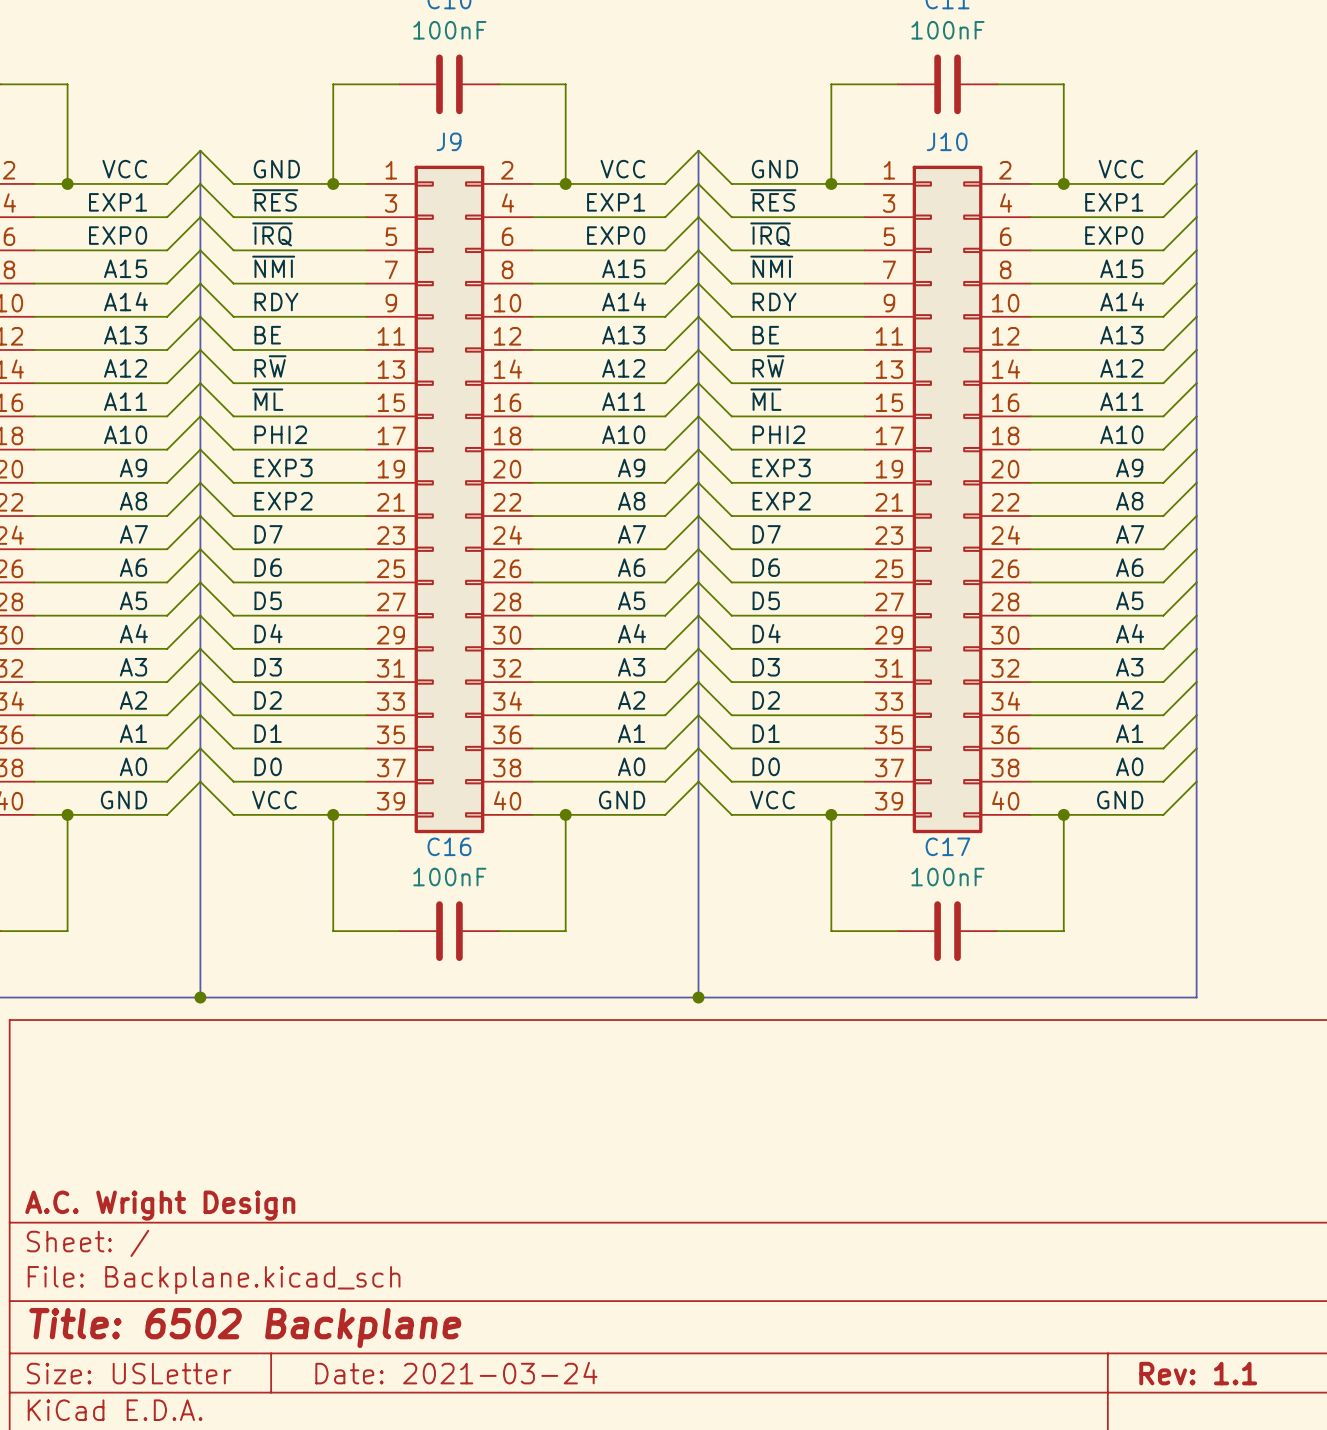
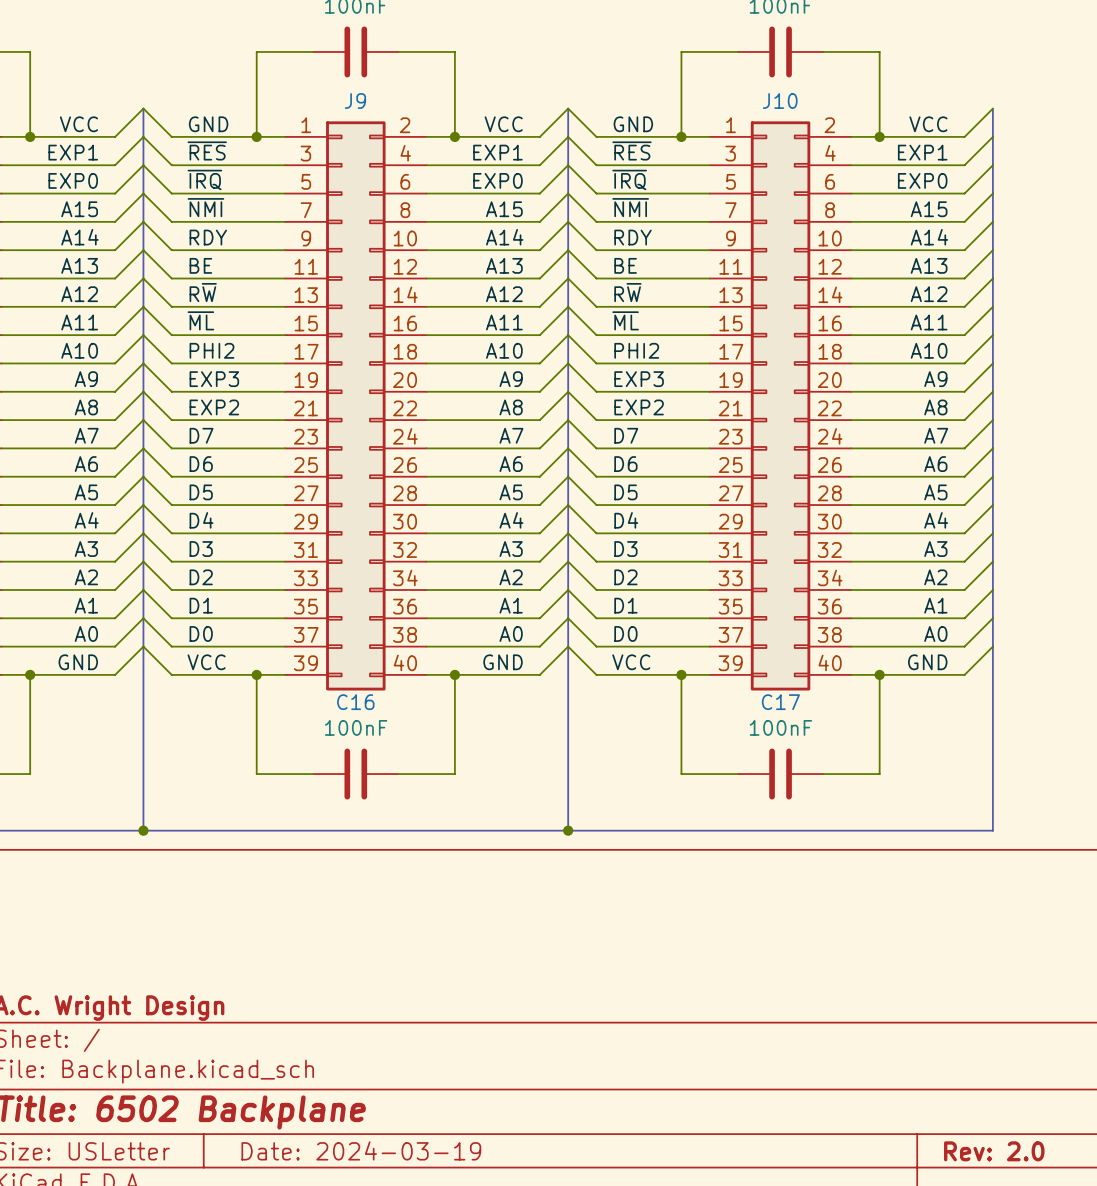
title block: Date: 2021-03-24 (456, 1373) -> Date: 2024-03-19 (361, 1150)
title block: Rev: 1.1 (1198, 1373) -> Rev: 2.0 (994, 1151)

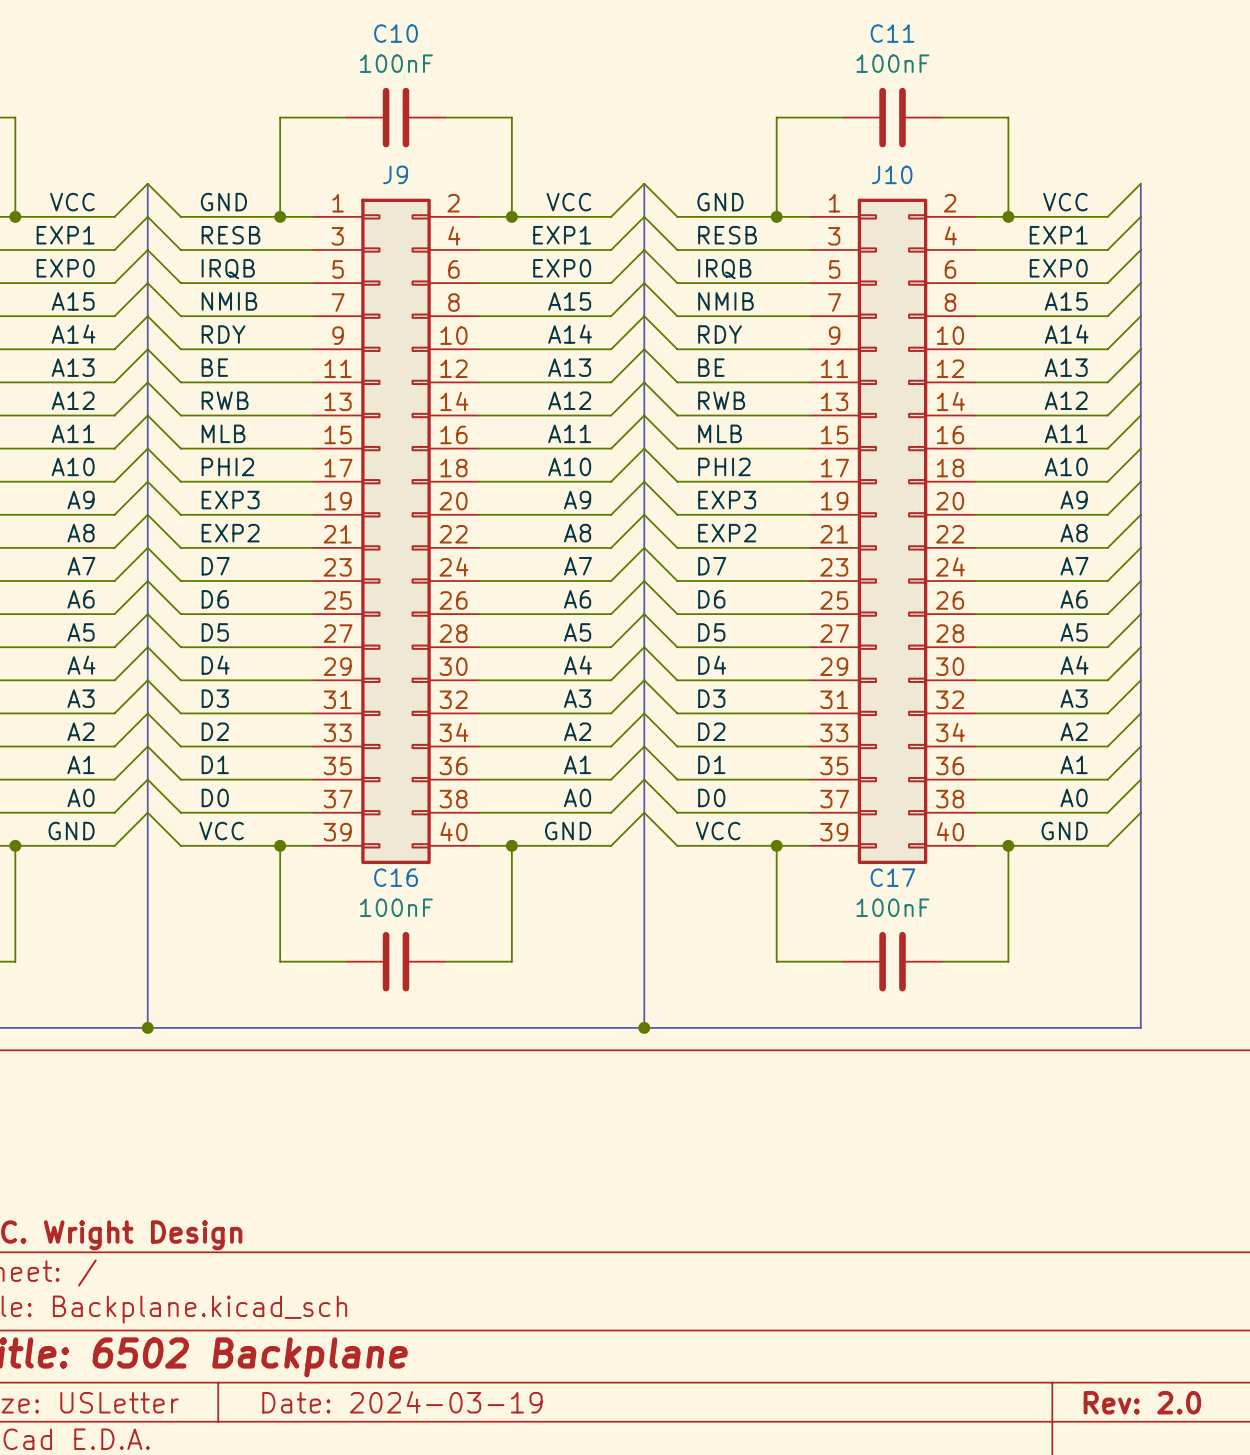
label: ~{RES} (207, 150) -> RESB (231, 235)
label: ~{RES} (632, 150) -> RESB (727, 235)
label: ~{IRQ} (204, 179) -> IRQB (228, 269)
label: ~{IRQ} (629, 179) -> IRQB (724, 269)
label: ~{NMI} (205, 207) -> NMIB (229, 301)
label: ~{NMI} (630, 207) -> NMIB (725, 301)
label: R~{W} (203, 292) -> RWB (225, 400)
label: R~{W} (627, 292) -> RWB (721, 400)
label: ~{ML} (200, 320) -> MLB (223, 433)
label: ~{ML} (625, 320) -> MLB (720, 433)

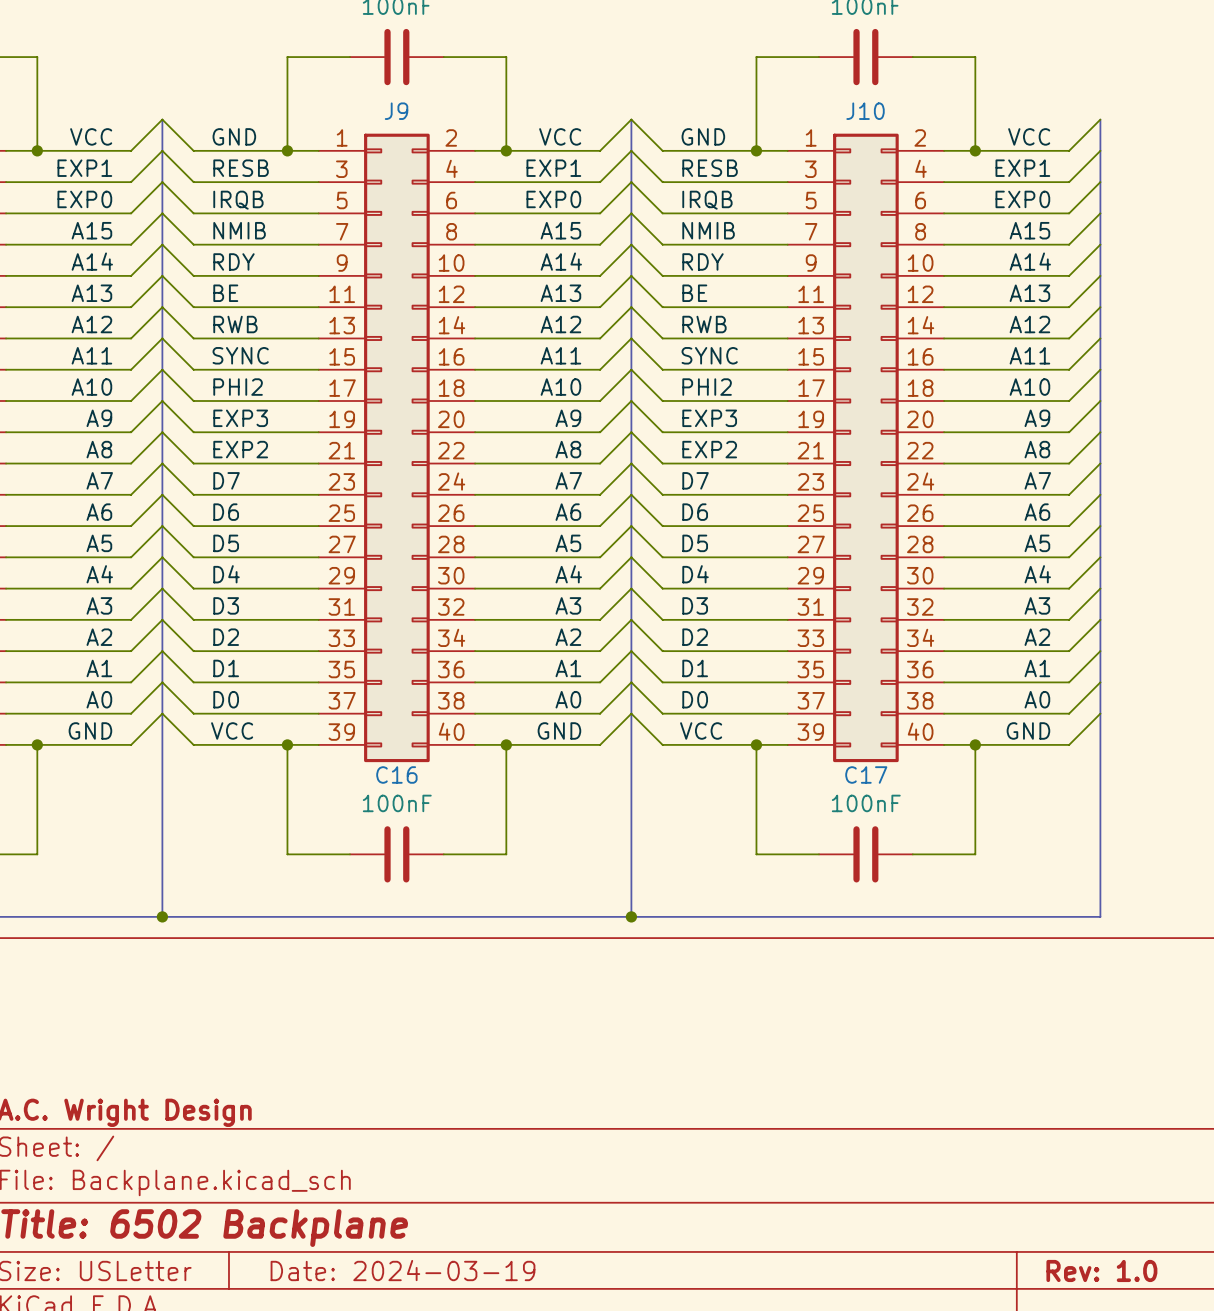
label: MLB (223, 433) -> SYNC (240, 355)
label: MLB (720, 433) -> SYNC (709, 355)
title block: Rev: 2.0 (1142, 1402) -> Rev: 1.0 (1101, 1270)

